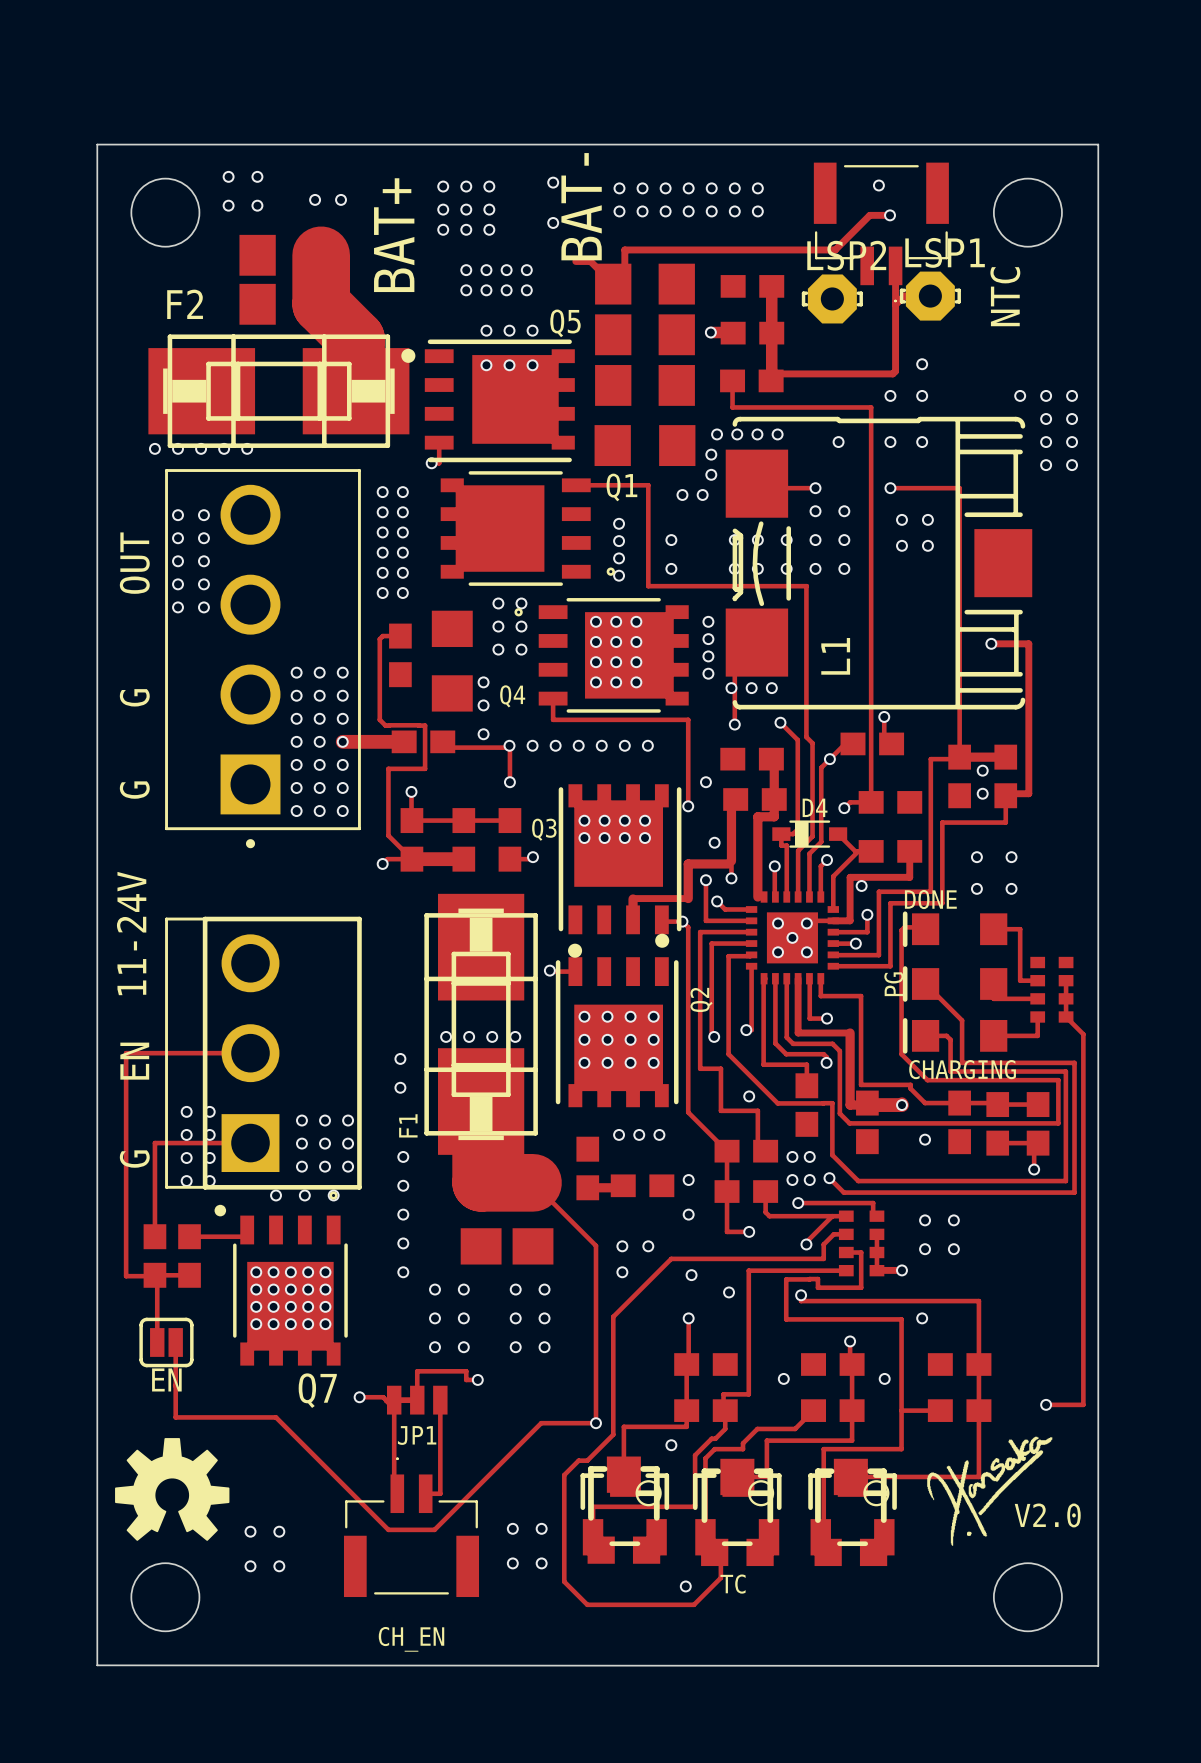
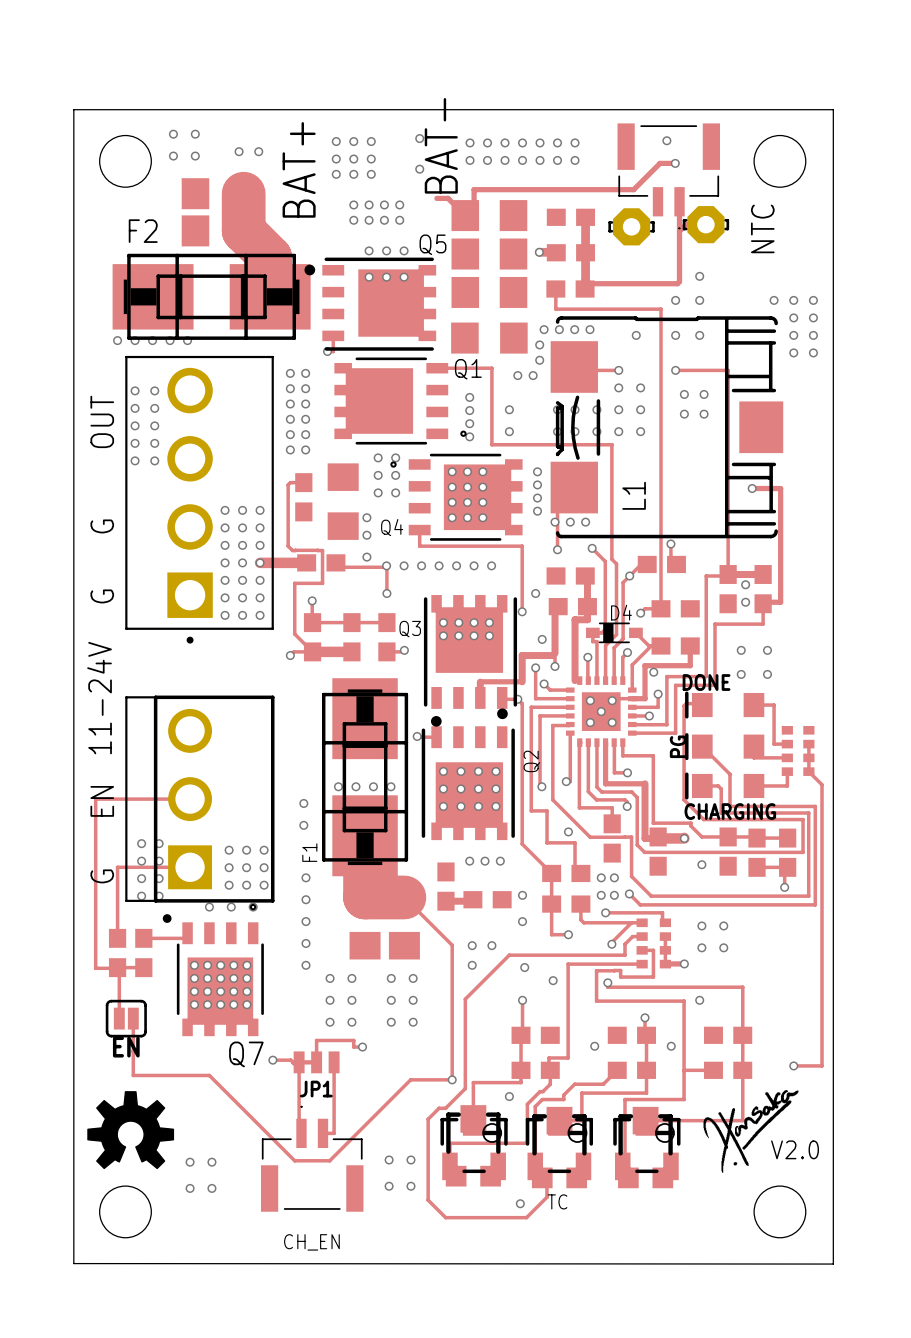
LSP1 name: LSP1 (945, 252) -> none
LSP2 name: LSP2 (846, 255) -> none

